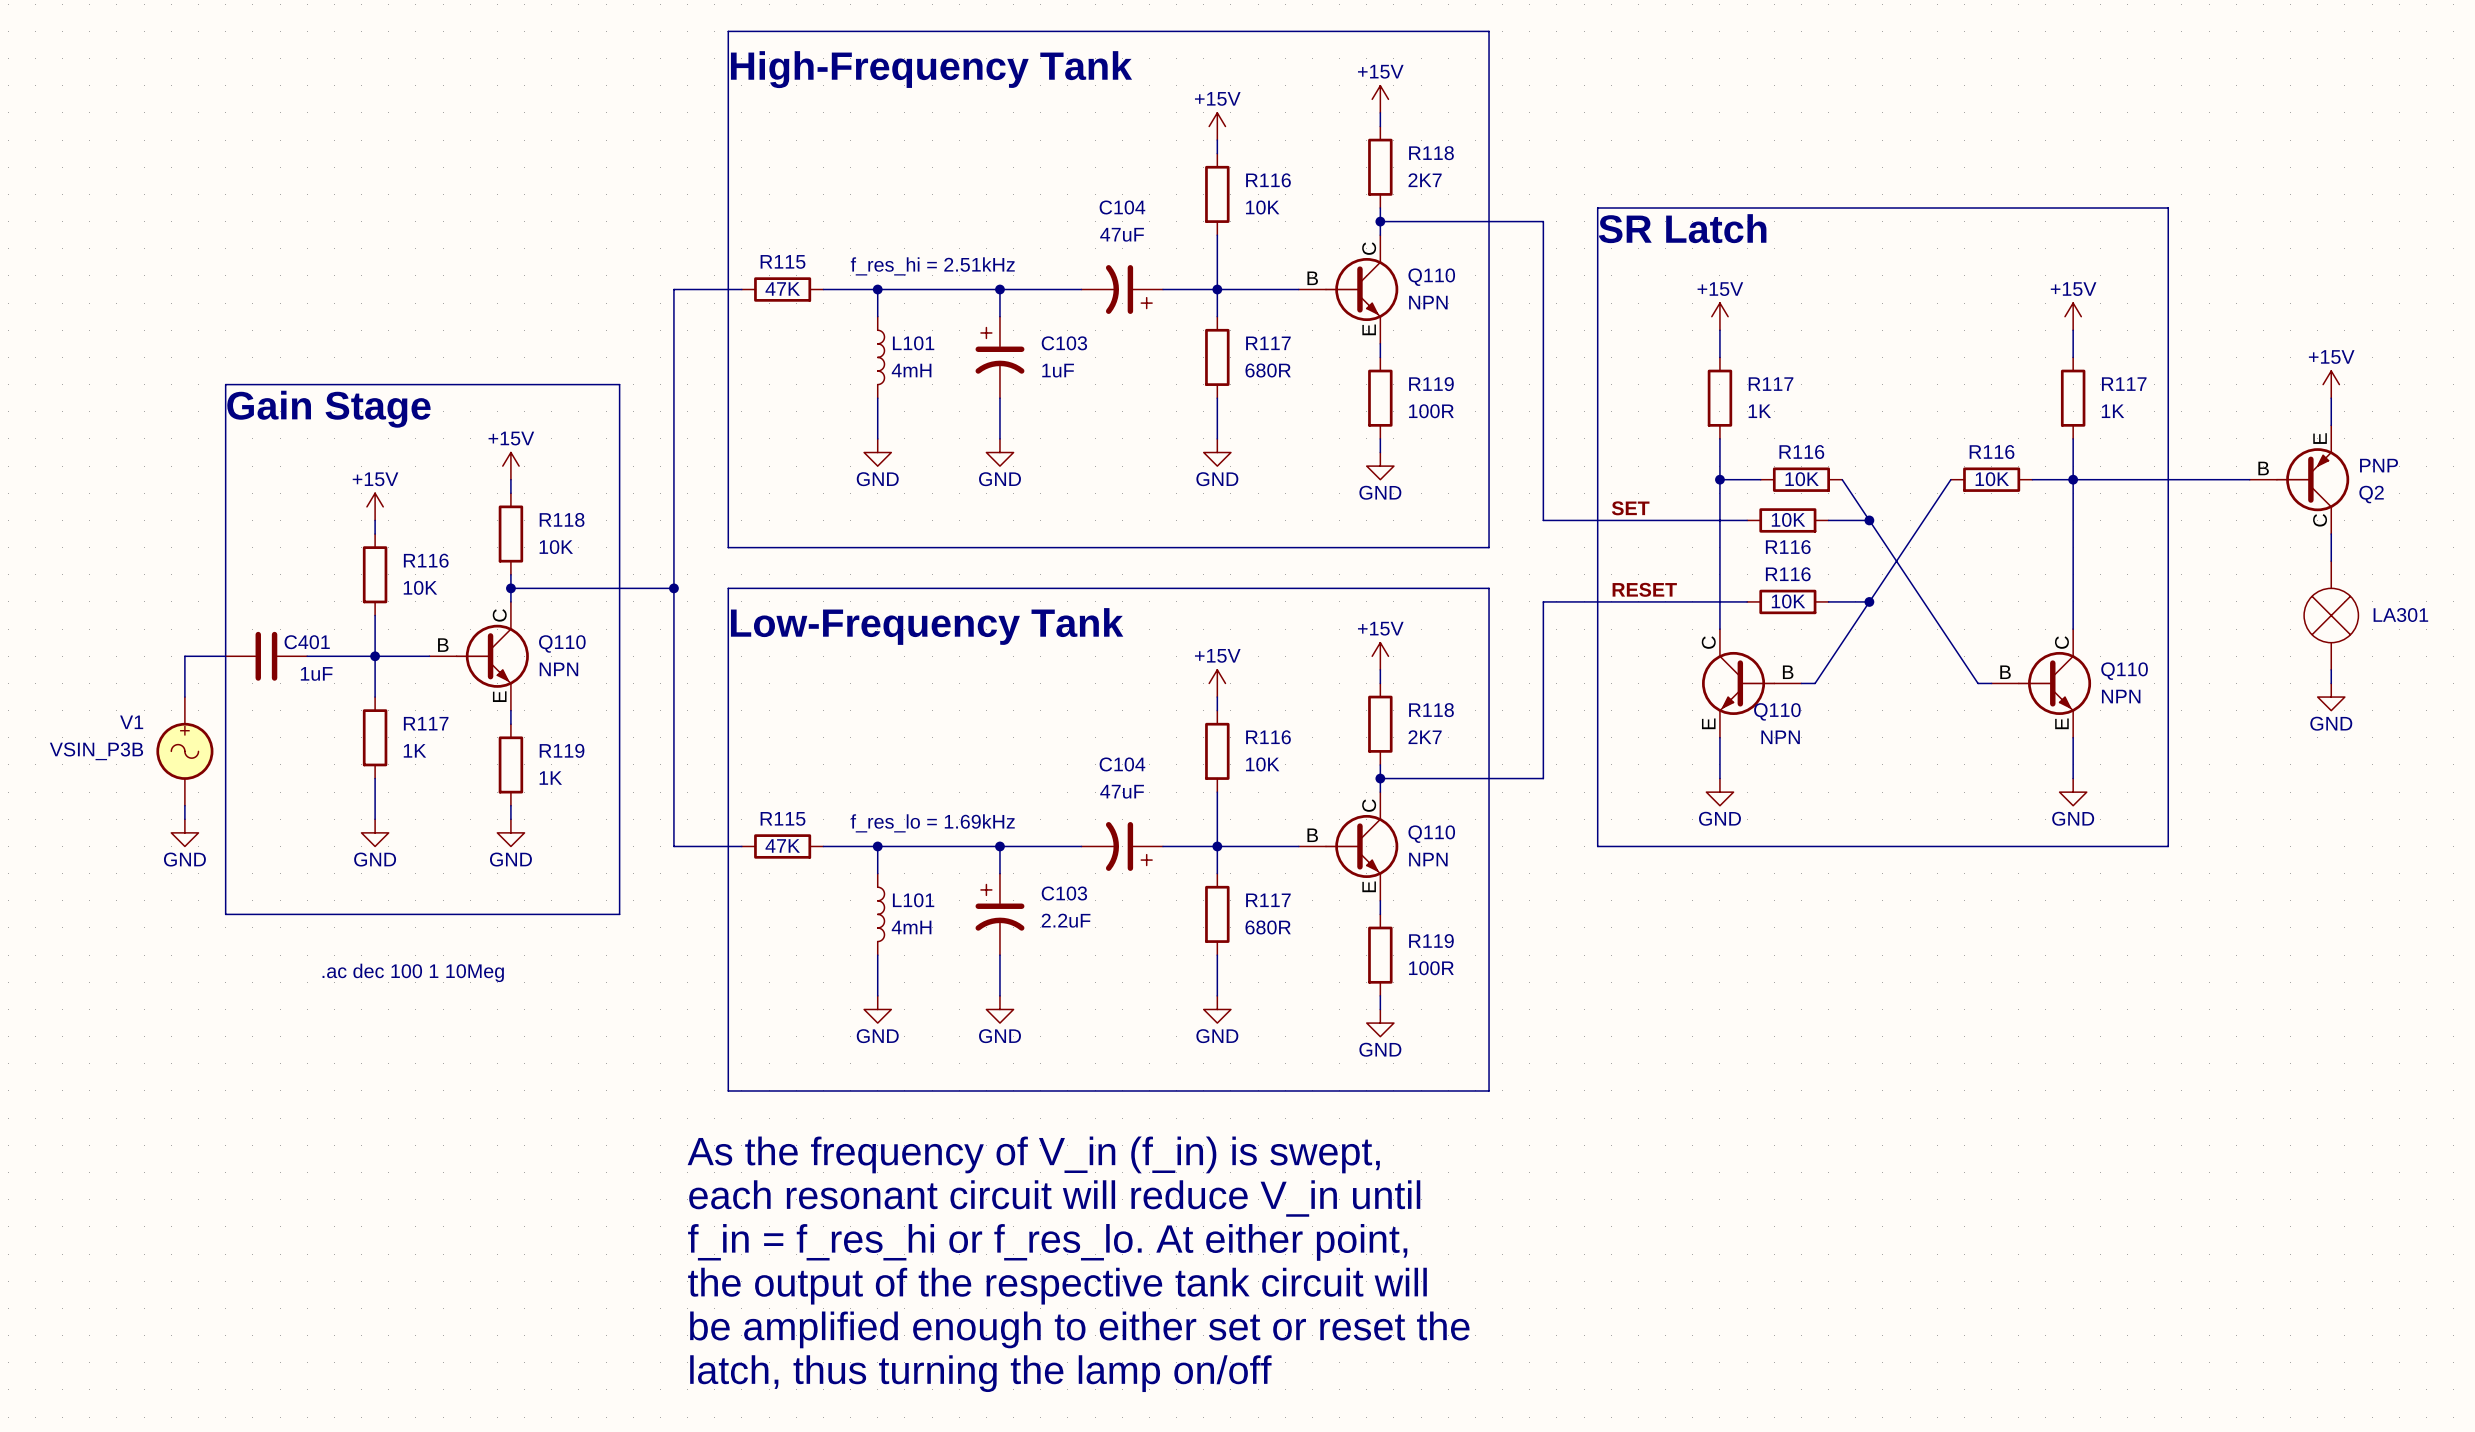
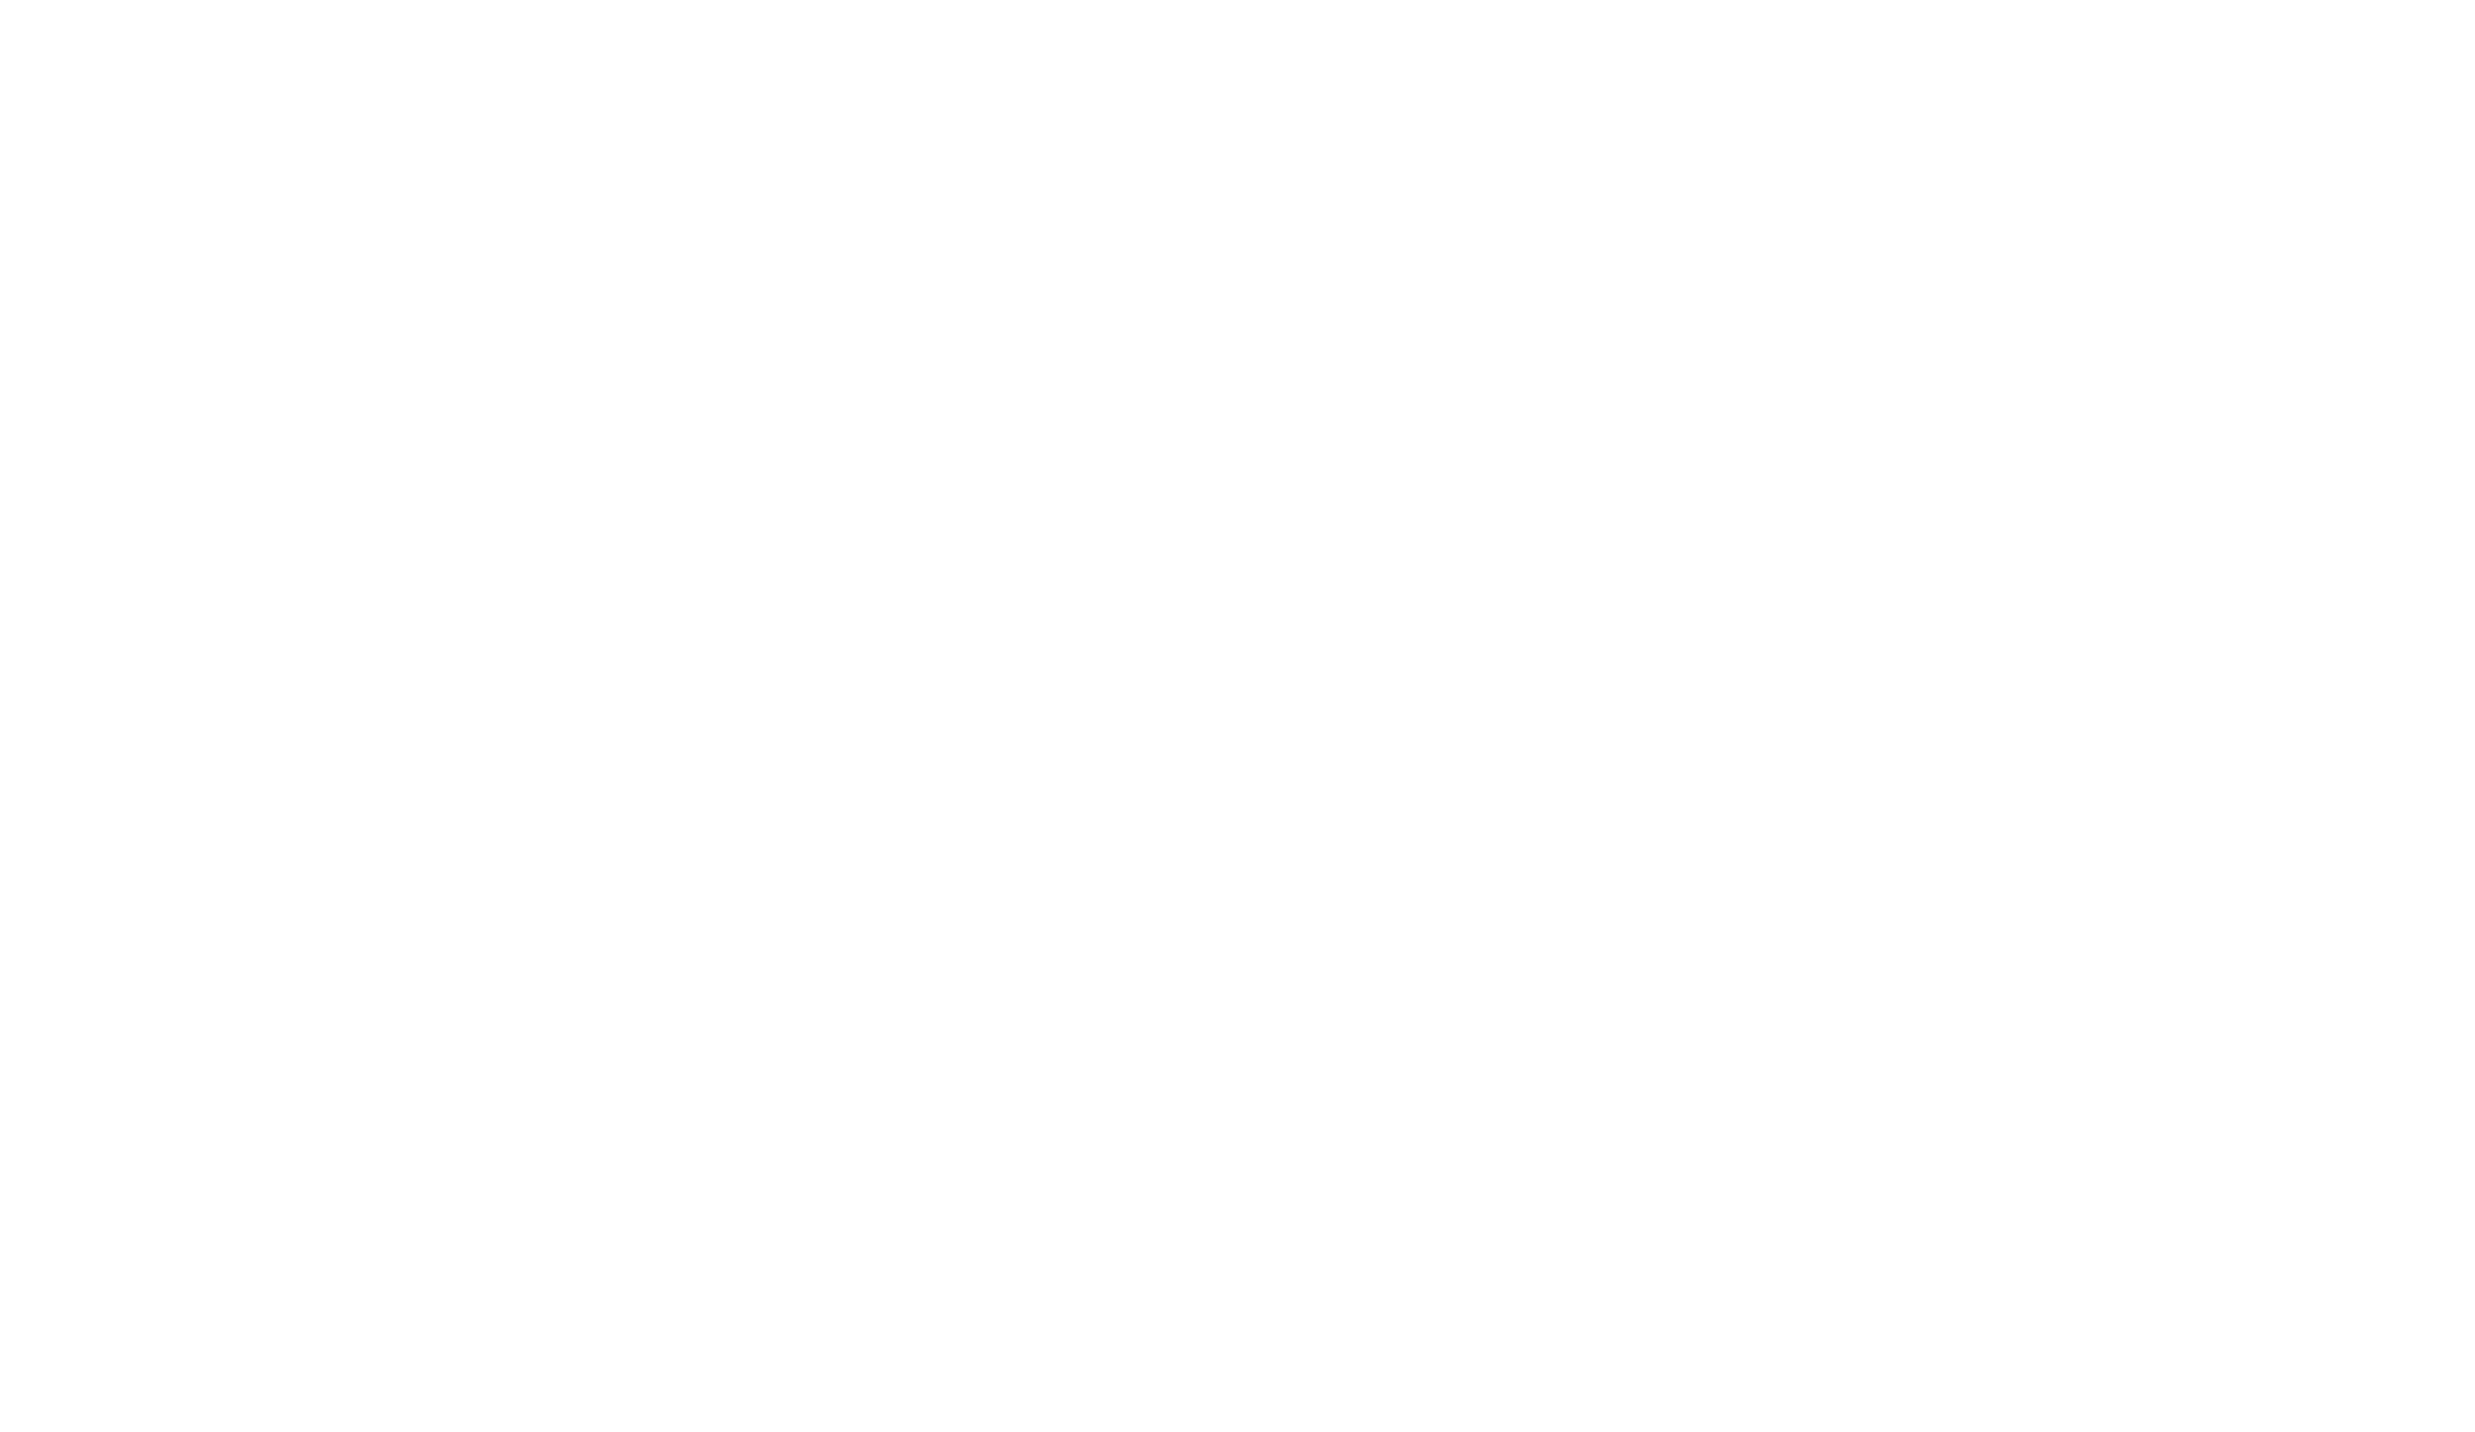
line: (728, 31) (1489, 31) (1489, 547) (728, 547) (728, 31) -> none
text: High-Frequency Tank (931, 69) -> none
power symbol: +15V (1380, 99) -> none
wire: (1380, 112) (1380, 126) -> none
power symbol: +15V (1217, 126) -> none
wire: (1217, 140) (1217, 153) -> none
R118: 2K7 (1380, 167) -> none
R116: 10K (1217, 194) -> none
wire: (1380, 208) (1380, 235) -> none
line: (1597, 208) (2168, 208) (2168, 846) (1597, 846) (1597, 208) -> none
wire: (1380, 221) (1543, 221) (1543, 520) (1747, 520) -> none
junction: (1380, 221) -> none
text: SR Latch (1682, 228) -> none
wire: (1217, 235) (1217, 316) -> none
text: f_res_hi = 2.51kHz (932, 266) -> none
wire: (741, 289) (673, 289) (673, 846) (741, 846) -> none
R115: 47K (782, 289) -> none
wire: (823, 289) (1081, 289) -> none
wire: (877, 289) (877, 316) -> none
junction: (877, 289) -> none
wire: (999, 289) (999, 316) -> none
junction: (999, 289) -> none
C104: 47uF (1122, 289) -> none
wire: (1162, 289) (1298, 289) -> none
junction: (1217, 289) -> none
Q110: NPN (1348, 289) -> none
power symbol: +15V (1719, 316) -> none
power symbol: +15V (2073, 316) -> none
wire: (1719, 330) (1719, 357) -> none
wire: (2073, 330) (2073, 357) -> none
wire: (1380, 343) (1380, 357) -> none
L101: 4mH (881, 357) -> none
C103: 1uF (999, 357) -> none
R117: 680R (1217, 357) -> none
line: (225, 384) (619, 384) (619, 914) (225, 914) (225, 384) -> none
power symbol: +15V (2331, 384) -> none
wire: (877, 398) (877, 438) -> none
wire: (999, 398) (999, 438) -> none
wire: (1217, 398) (1217, 438) -> none
R119: 100R (1380, 398) -> none
R117: 1K (1719, 398) -> none
R117: 1K (2073, 398) -> none
wire: (2331, 398) (2331, 425) -> none
text: Gain Stage (328, 409) -> none
wire: (1380, 438) (1380, 452) -> none
wire: (1719, 438) (1719, 629) -> none
wire: (2073, 438) (2073, 629) -> none
power symbol: GND (877, 452) -> none
power symbol: GND (999, 452) -> none
power symbol: GND (1217, 452) -> none
power symbol: +15V (510, 466) -> none
power symbol: GND (1380, 466) -> none
wire: (510, 479) (510, 493) -> none
wire: (1719, 479) (1760, 479) -> none
junction: (1719, 479) -> none
R116: 10K (1801, 479) -> none
wire: (1842, 479) (1978, 683) (1991, 683) -> none
wire: (1950, 479) (1815, 683) (1801, 683) -> none
R116: 10K (1991, 479) -> none
wire: (2032, 479) (2249, 479) -> none
junction: (2073, 479) -> none
Q2: PNP (2299, 479) -> none
power symbol: +15V (375, 506) -> none
label: SET (1630, 508) -> none
wire: (375, 520) (375, 534) -> none
R116: 10K (1787, 520) -> none
wire: (1828, 520) (1869, 520) -> none
junction: (1869, 520) -> none
R118: 10K (510, 534) -> none
wire: (2331, 534) (2331, 561) -> none
R116: 10K (375, 574) -> none
wire: (510, 574) (510, 601) -> none
wire: (510, 588) (673, 588) -> none
junction: (510, 588) -> none
junction: (673, 588) -> none
line: (728, 588) (728, 1090) (1489, 1090) (1489, 588) (728, 588) -> none
label: RESET (1644, 589) -> none
wire: (1747, 601) (1543, 601) (1543, 778) (1380, 778) -> none
R116: 10K (1787, 601) -> none
wire: (1828, 601) (1869, 601) -> none
junction: (1869, 601) -> none
wire: (375, 615) (375, 697) -> none
LA301: (2331, 615) -> none
text: Low-Frequency Tank (927, 626) -> none
wire: (225, 656) (184, 656) (184, 697) -> none
C401: 1uF (266, 656) -> none
wire: (307, 656) (429, 656) -> none
junction: (375, 656) -> none
Q110: NPN (479, 656) -> none
power symbol: +15V (1380, 656) -> none
wire: (1380, 669) (1380, 683) -> none
wire: (2331, 669) (2331, 683) -> none
power symbol: +15V (1217, 683) -> none
Q110: NPN (1751, 683) -> none
Q110: NPN (2041, 683) -> none
wire: (1217, 697) (1217, 710) -> none
power symbol: GND (2331, 697) -> none
wire: (510, 710) (510, 724) -> none
R118: 2K7 (1380, 724) -> none
R117: 1K (375, 737) -> none
wire: (1719, 737) (1719, 778) -> none
wire: (2073, 737) (2073, 778) -> none
V1: VSIN_P3B (184, 751) -> none
R116: 10K (1217, 751) -> none
R119: 1K (510, 764) -> none
wire: (1380, 764) (1380, 792) -> none
wire: (375, 778) (375, 819) -> none
junction: (1380, 778) -> none
wire: (1217, 792) (1217, 873) -> none
power symbol: GND (1719, 792) -> none
power symbol: GND (2073, 792) -> none
wire: (184, 805) (184, 819) -> none
wire: (510, 805) (510, 819) -> none
text: f_res_lo = 1.69kHz (932, 823) -> none
power symbol: GND (184, 832) -> none
power symbol: GND (375, 832) -> none
power symbol: GND (510, 832) -> none
R115: 47K (782, 846) -> none
wire: (823, 846) (1081, 846) -> none
wire: (877, 846) (877, 873) -> none
junction: (877, 846) -> none
wire: (999, 846) (999, 873) -> none
junction: (999, 846) -> none
C104: 47uF (1122, 846) -> none
wire: (1162, 846) (1298, 846) -> none
junction: (1217, 846) -> none
Q110: NPN (1348, 846) -> none
wire: (1380, 900) (1380, 914) -> none
L101: 4mH (881, 914) -> none
C103: 2.2uF (999, 914) -> none
R117: 680R (1217, 914) -> none
wire: (877, 955) (877, 995) -> none
wire: (999, 955) (999, 995) -> none
wire: (1217, 955) (1217, 995) -> none
R119: 100R (1380, 955) -> none
text: .ac dec 100 1 10Meg (413, 972) -> none
wire: (1380, 995) (1380, 1009) -> none
power symbol: GND (877, 1009) -> none
power symbol: GND (999, 1009) -> none
power symbol: GND (1217, 1009) -> none
power symbol: GND (1380, 1023) -> none
text: As the frequency of V_in (f_in) is swept, (1033, 1154) -> none
text: each resonant circuit will reduce V_in until (1054, 1198) -> none
text: f_in = f_res_hi or f_res_lo. At either point, (1047, 1242) -> none
text: the output of the respective tank circuit will (1057, 1286) -> none
text: be amplified enough to either set or reset the (1079, 1329) -> none
text: latch, thus turning the lamp on/off (980, 1373) -> none

